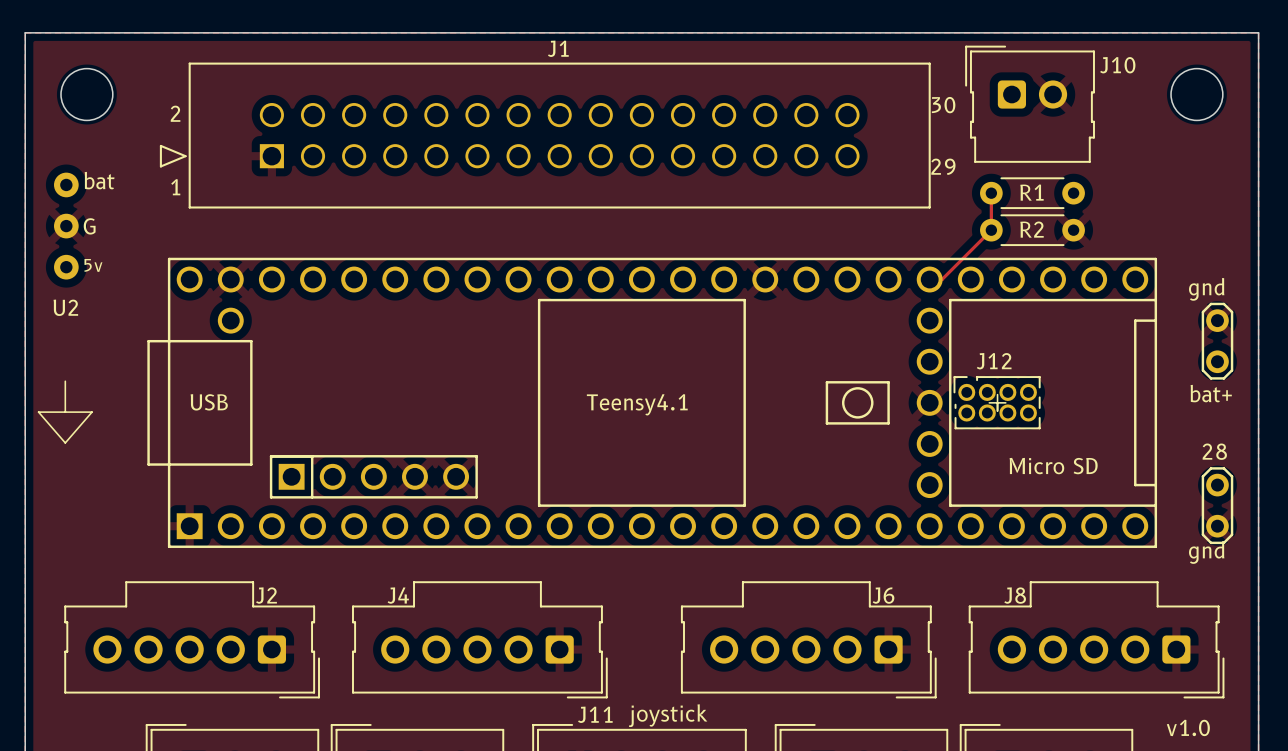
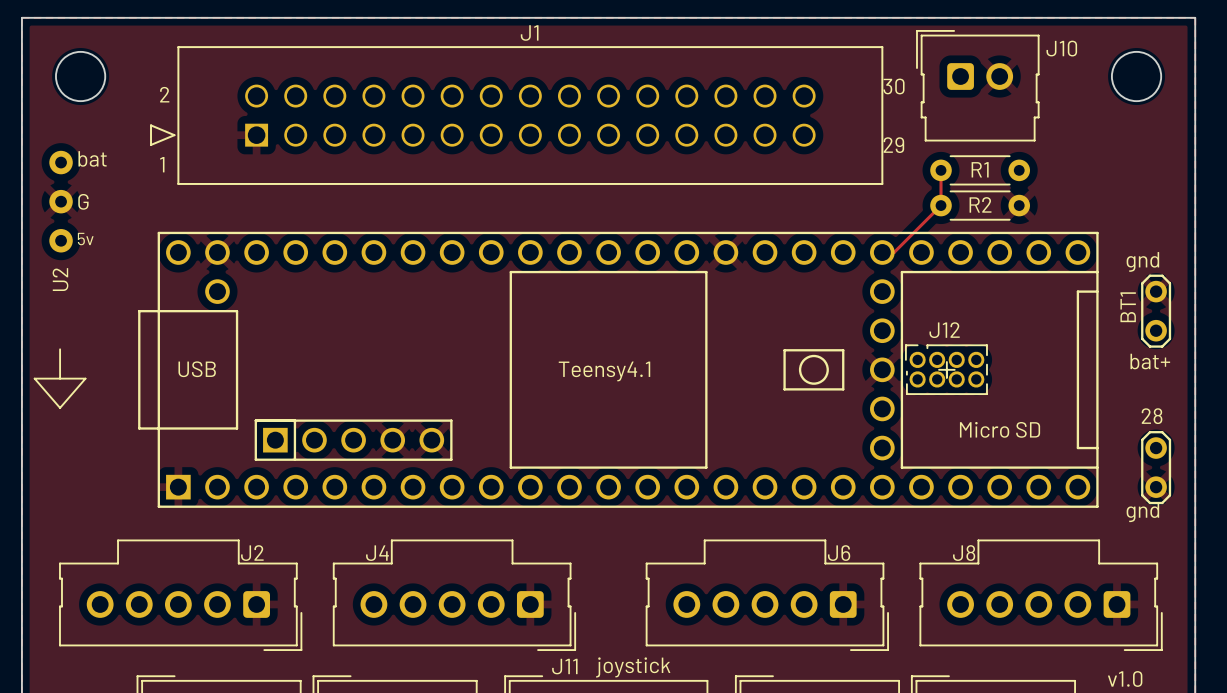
U2 name rotation: 0° (65, 307) -> 90° counterclockwise (60, 279)
BT1 name: none -> BT1 (1128, 307)

